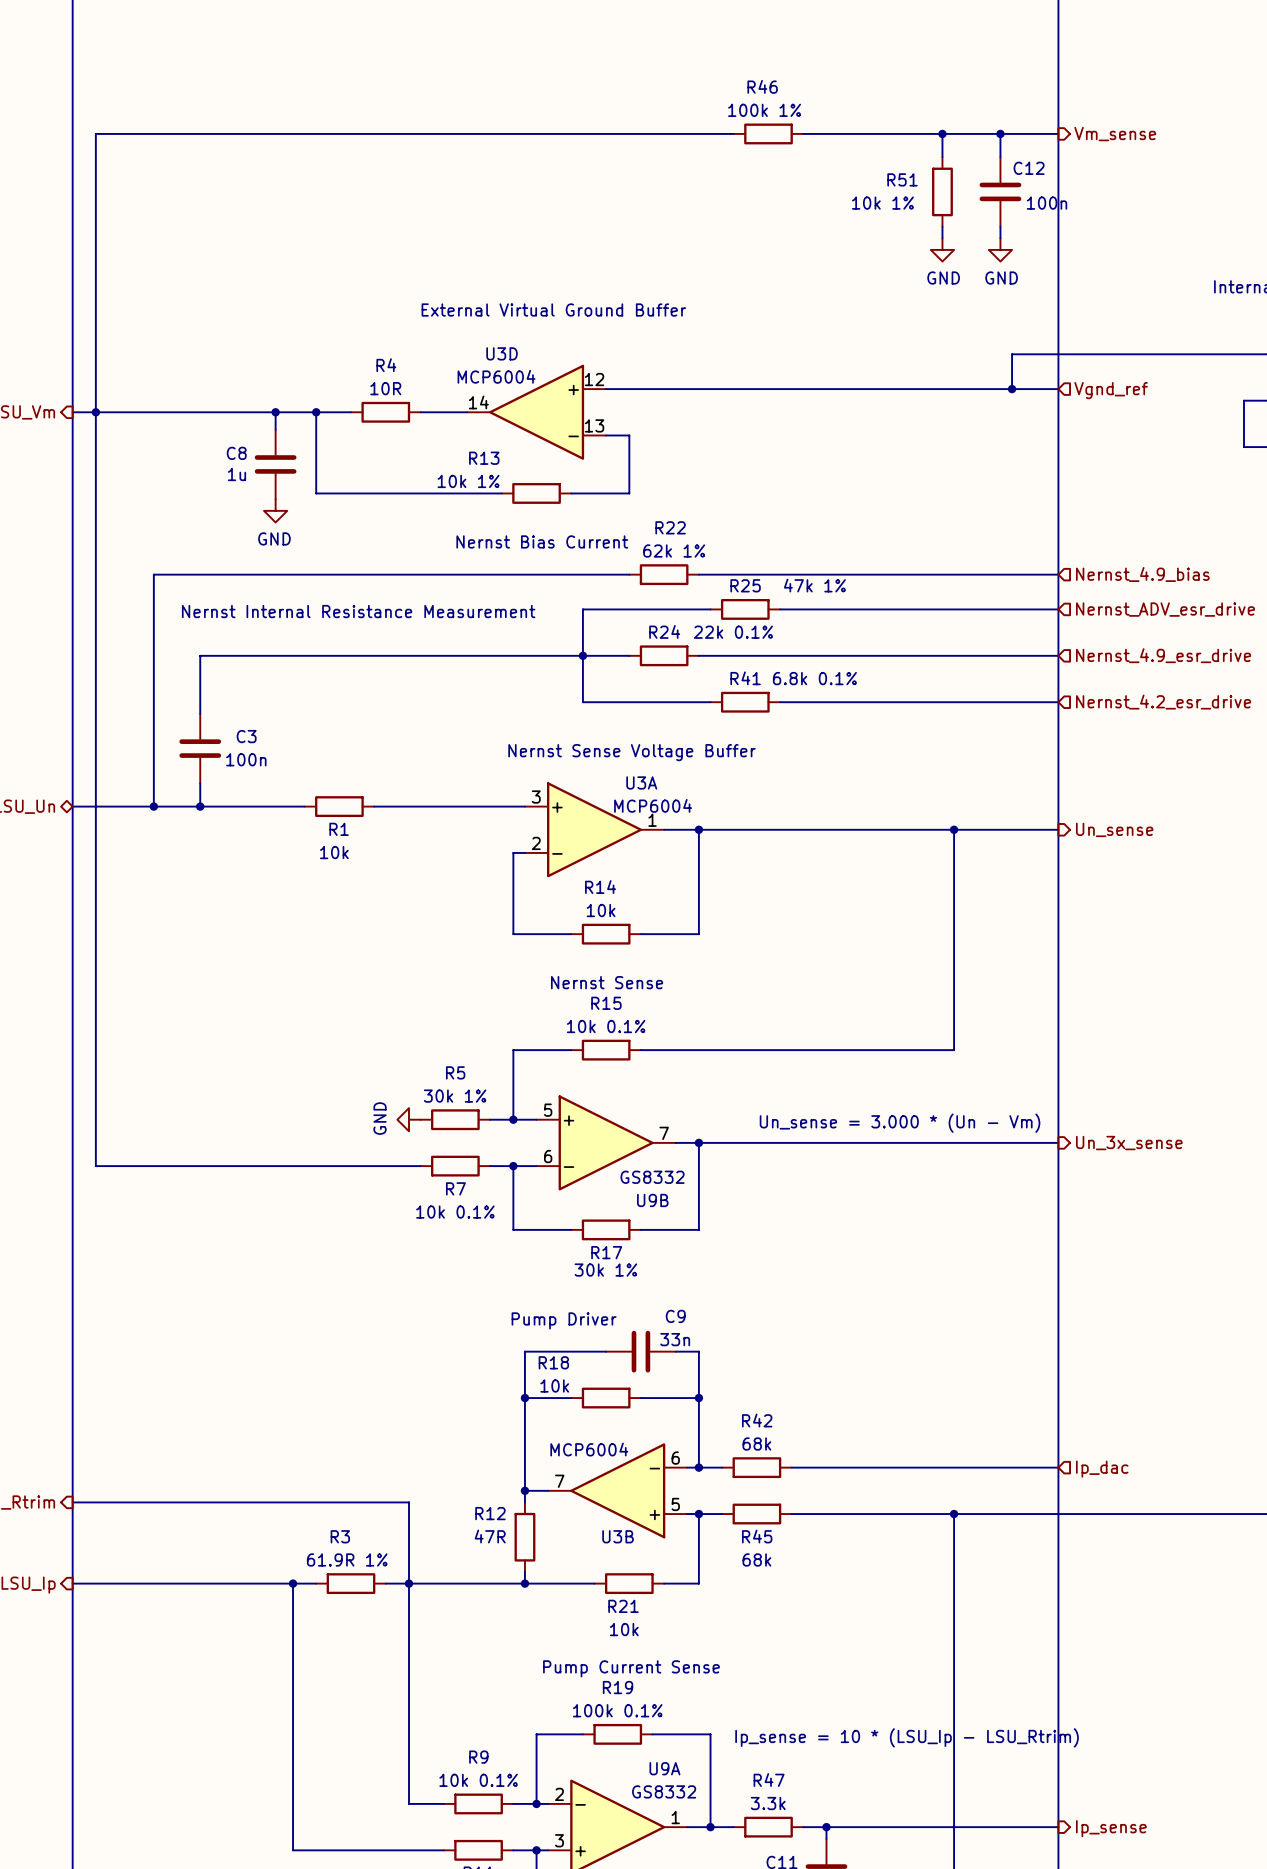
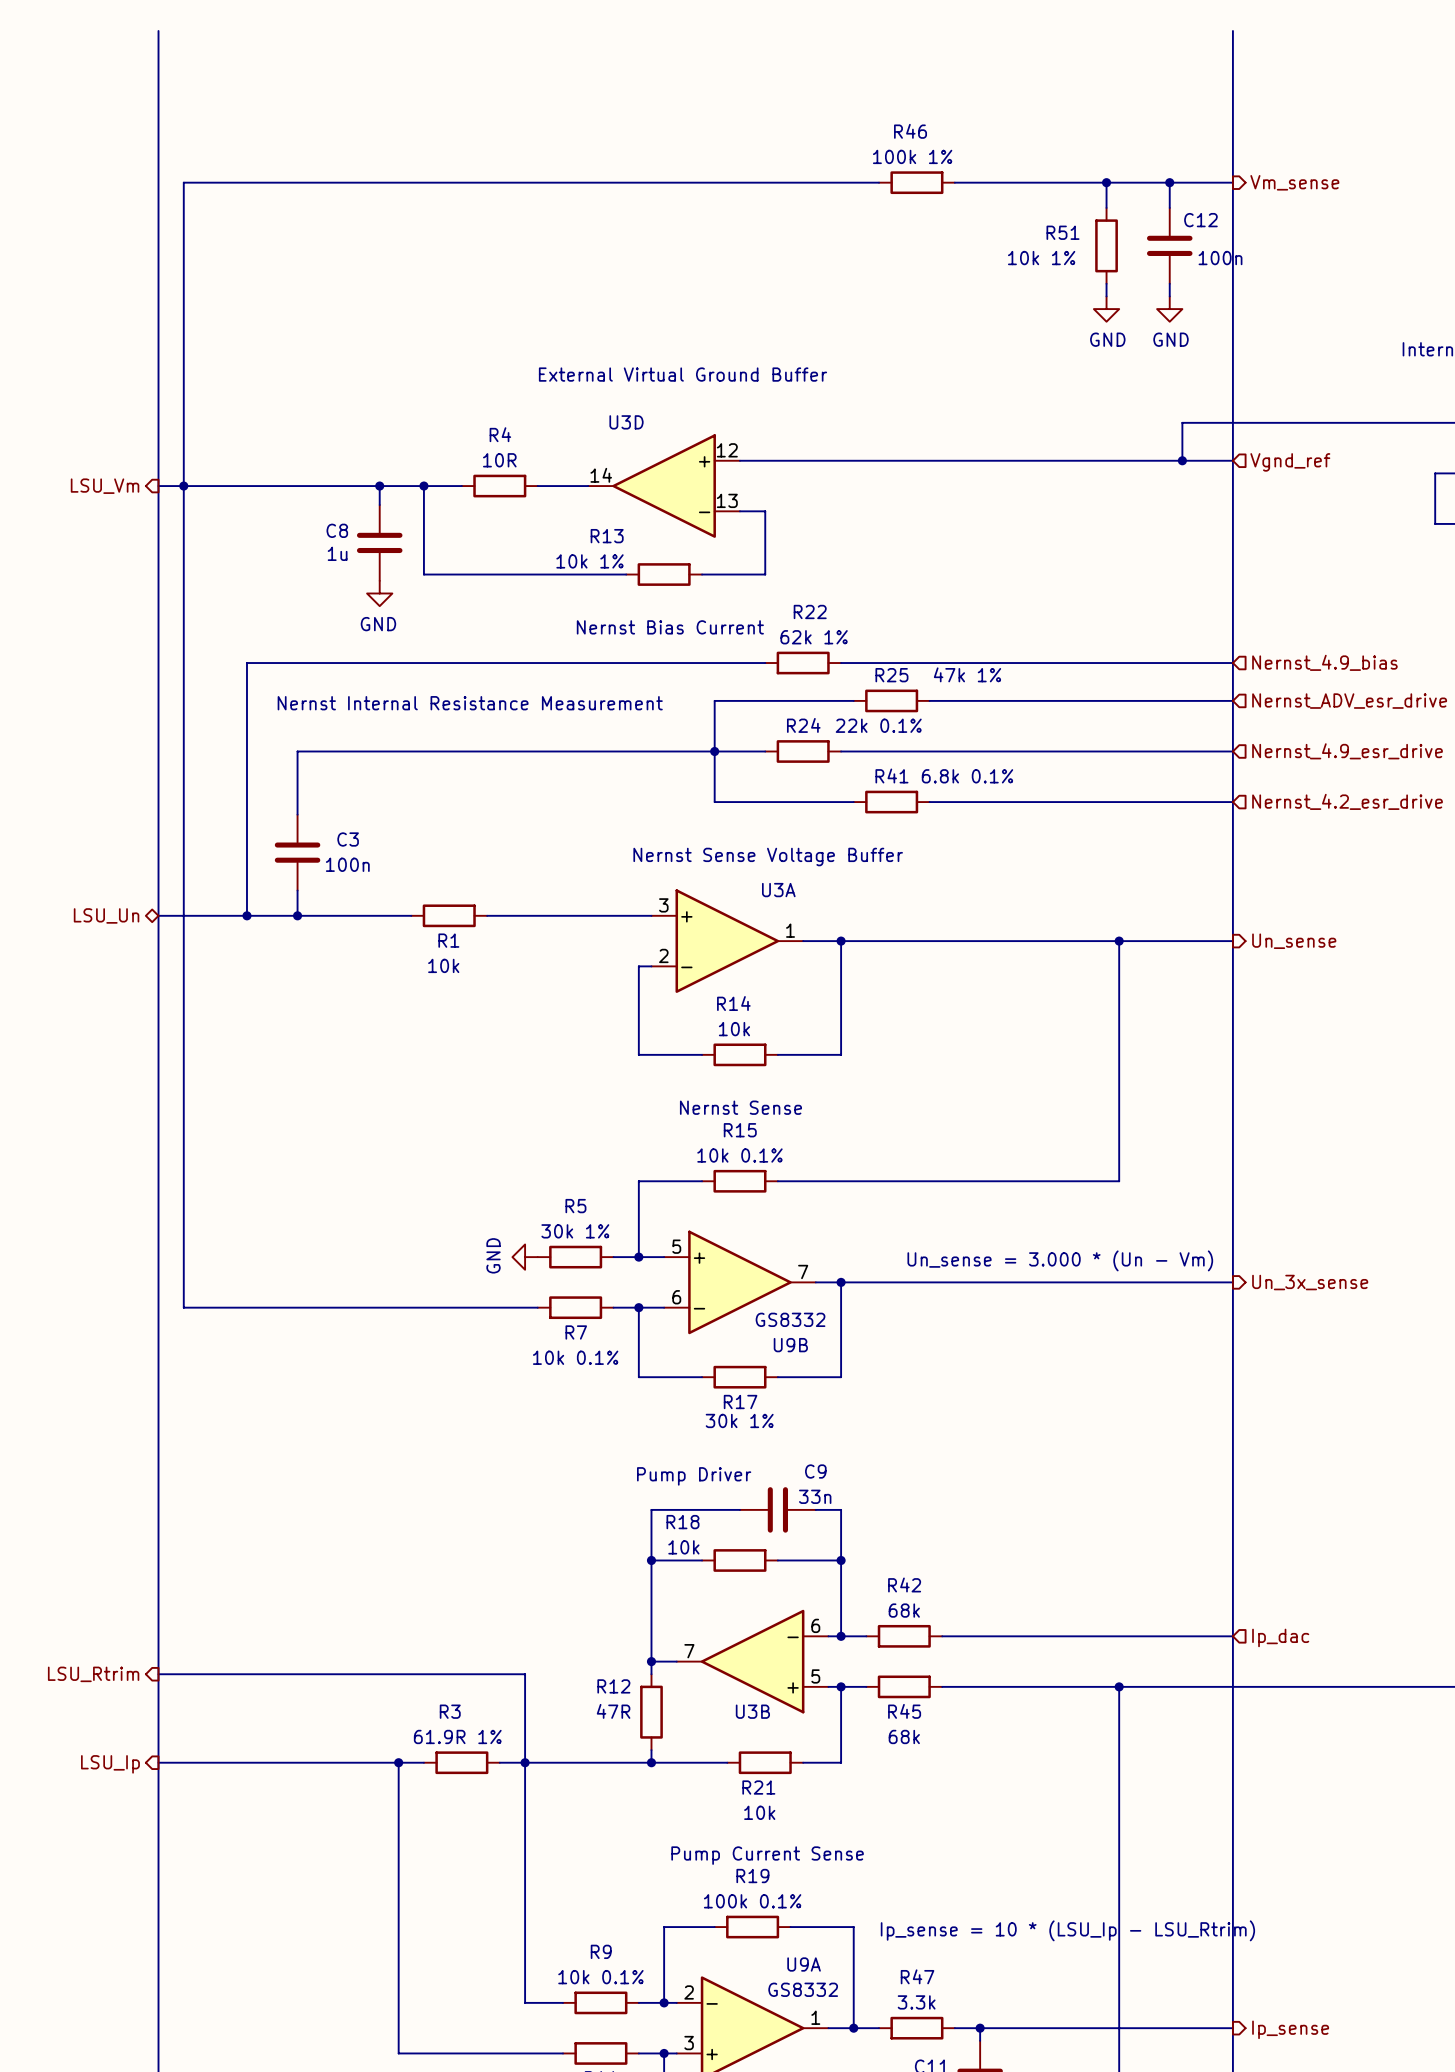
U3D value: MCP6004 (496, 376) -> none
U3A value: MCP6004 (653, 805) -> none
U3B value: MCP6004 (589, 1449) -> none

